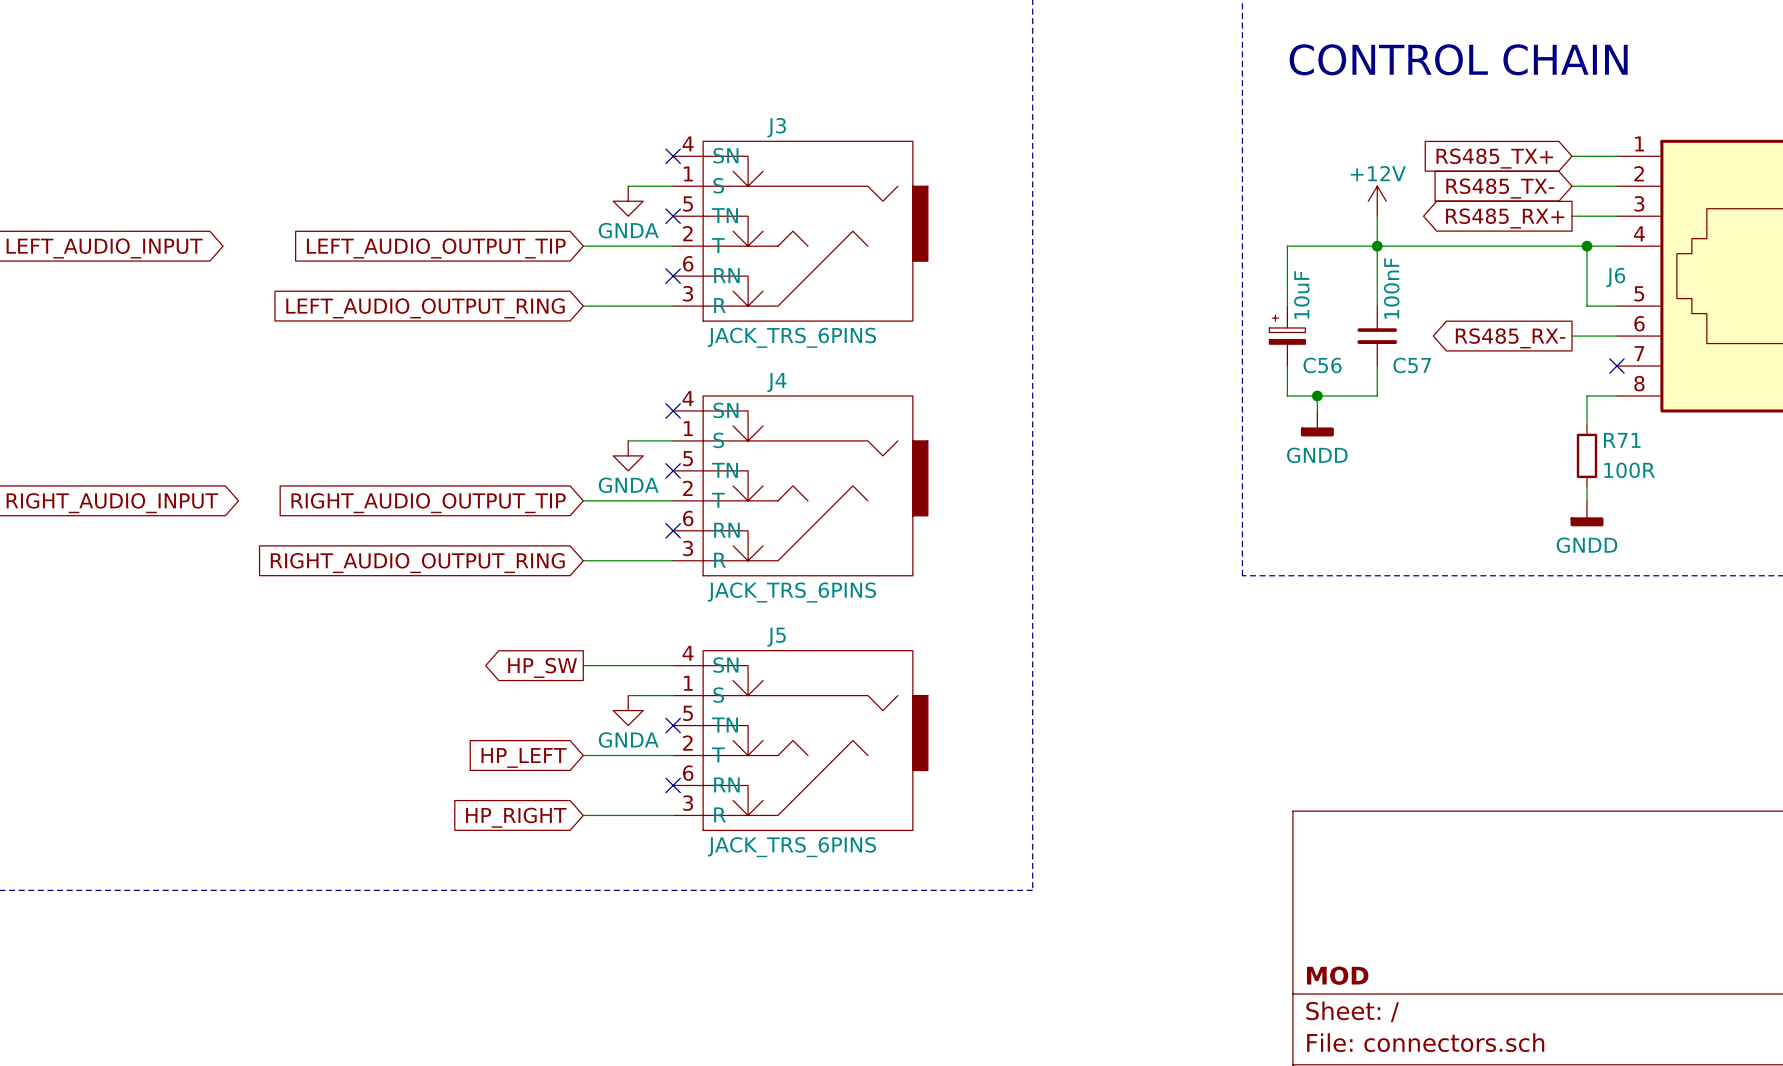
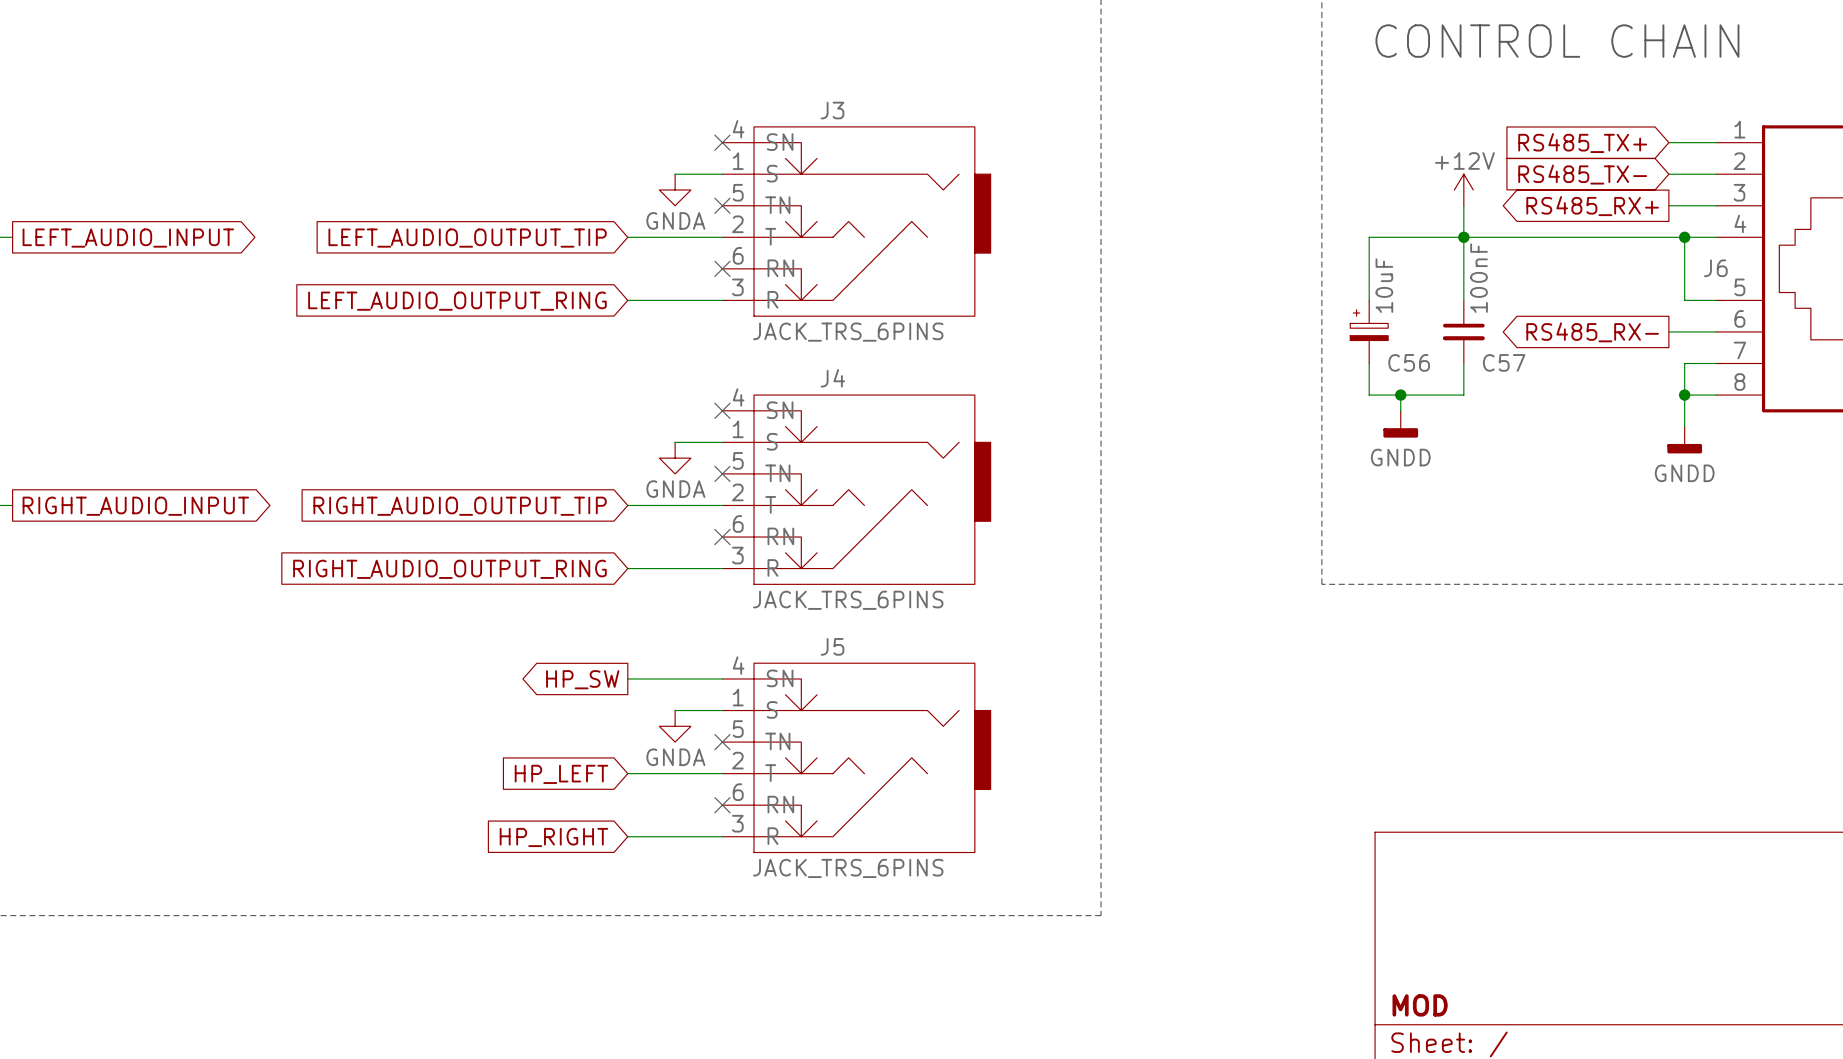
wire: none -> (1716, 363) (1684, 363) (1684, 395)
no-connect mark: (1616, 366) -> none
junction: none -> (1684, 395)
R71: 100R (1587, 455) -> none
wire: (1587, 485) (1587, 500) -> none
power symbol position: GNDD (1587, 513) -> GNDD (1684, 440)

